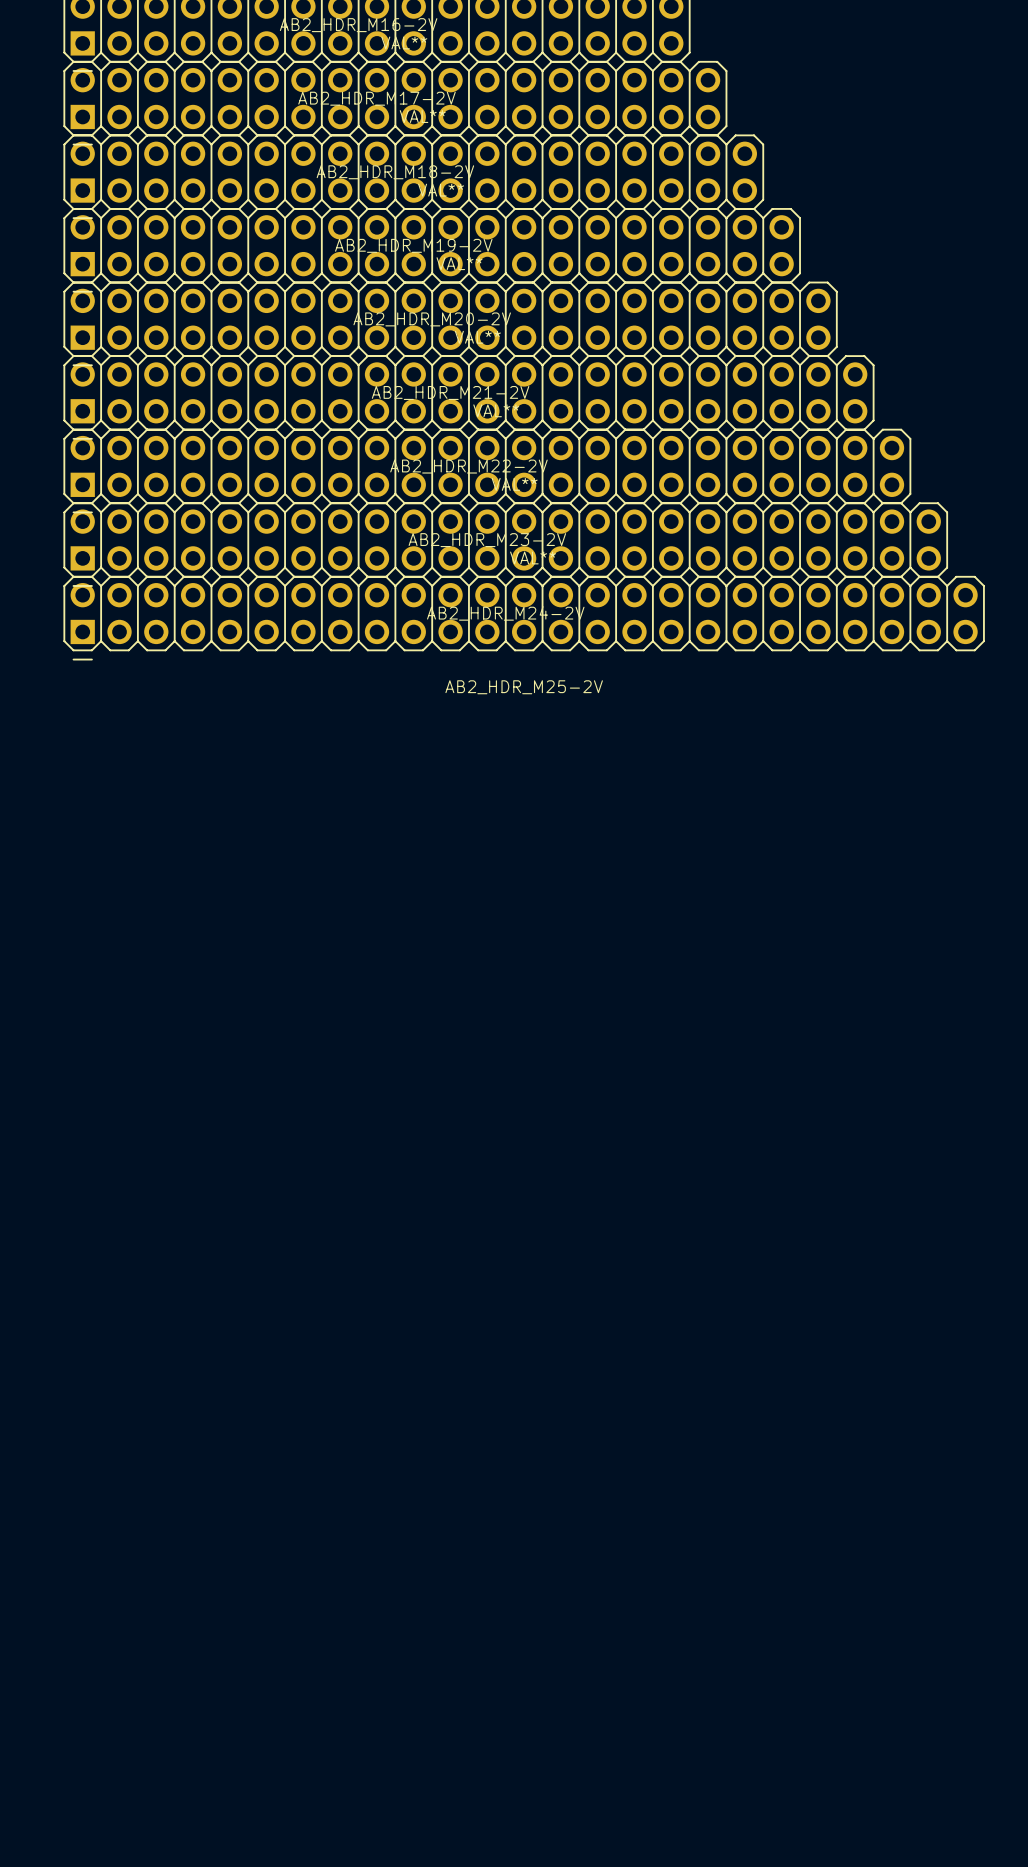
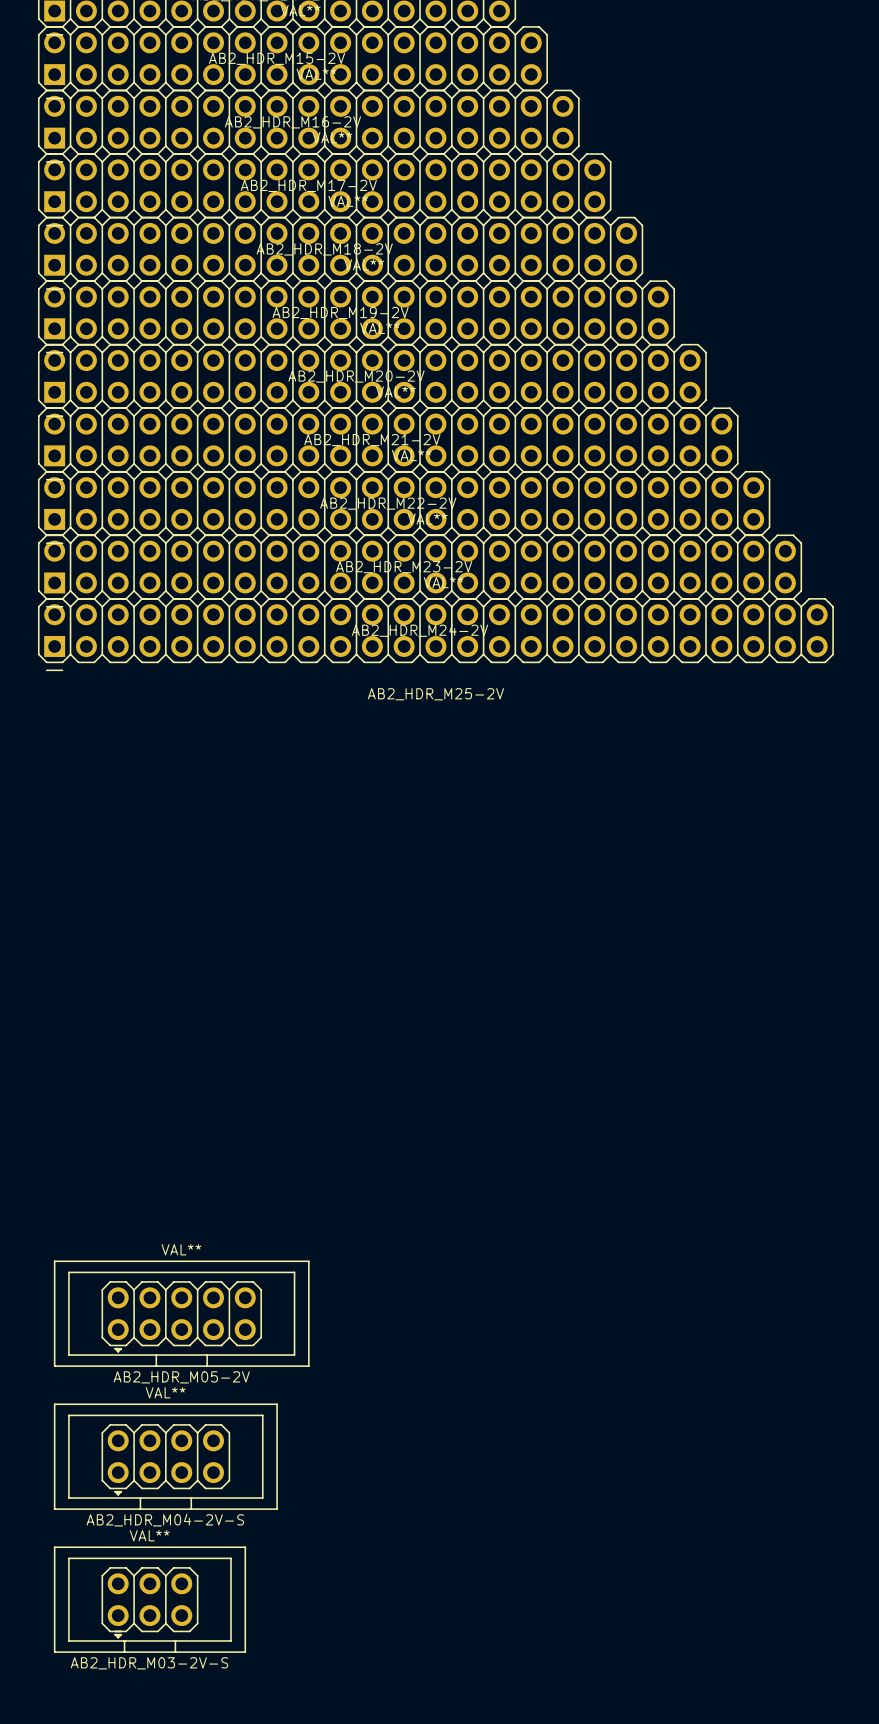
AB2_HDR_M05-2V: none -> VAL** (181, 1313)
AB2_HDR_M04-2V-S: none -> VAL** (165, 1456)
AB2_HDR_M03-2V-S: none -> VAL** (149, 1599)

